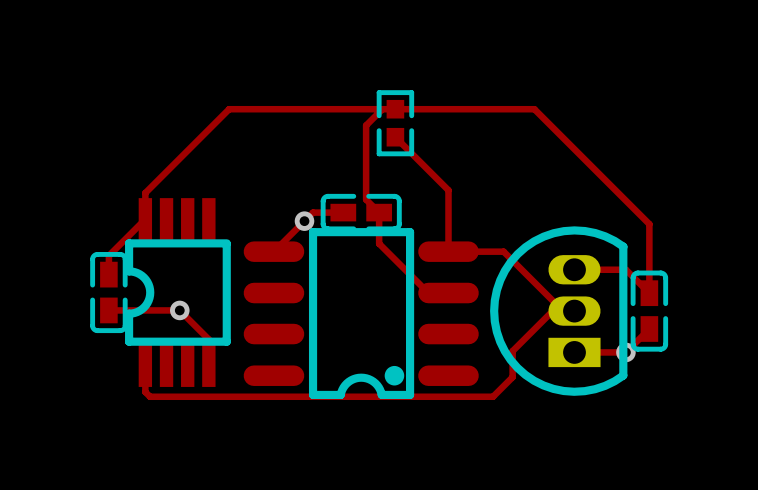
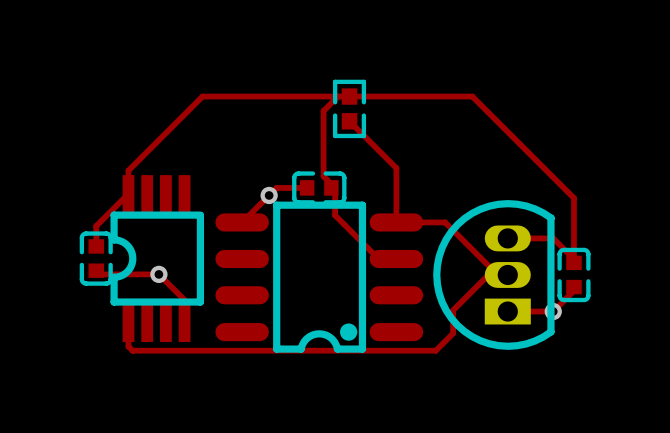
part footprint: [320, 193, 402, 232] -> [292, 171, 347, 205]
part footprint: [90, 251, 128, 334] -> [79, 231, 113, 286]
part footprint: [630, 270, 669, 352] -> [557, 247, 591, 303]

